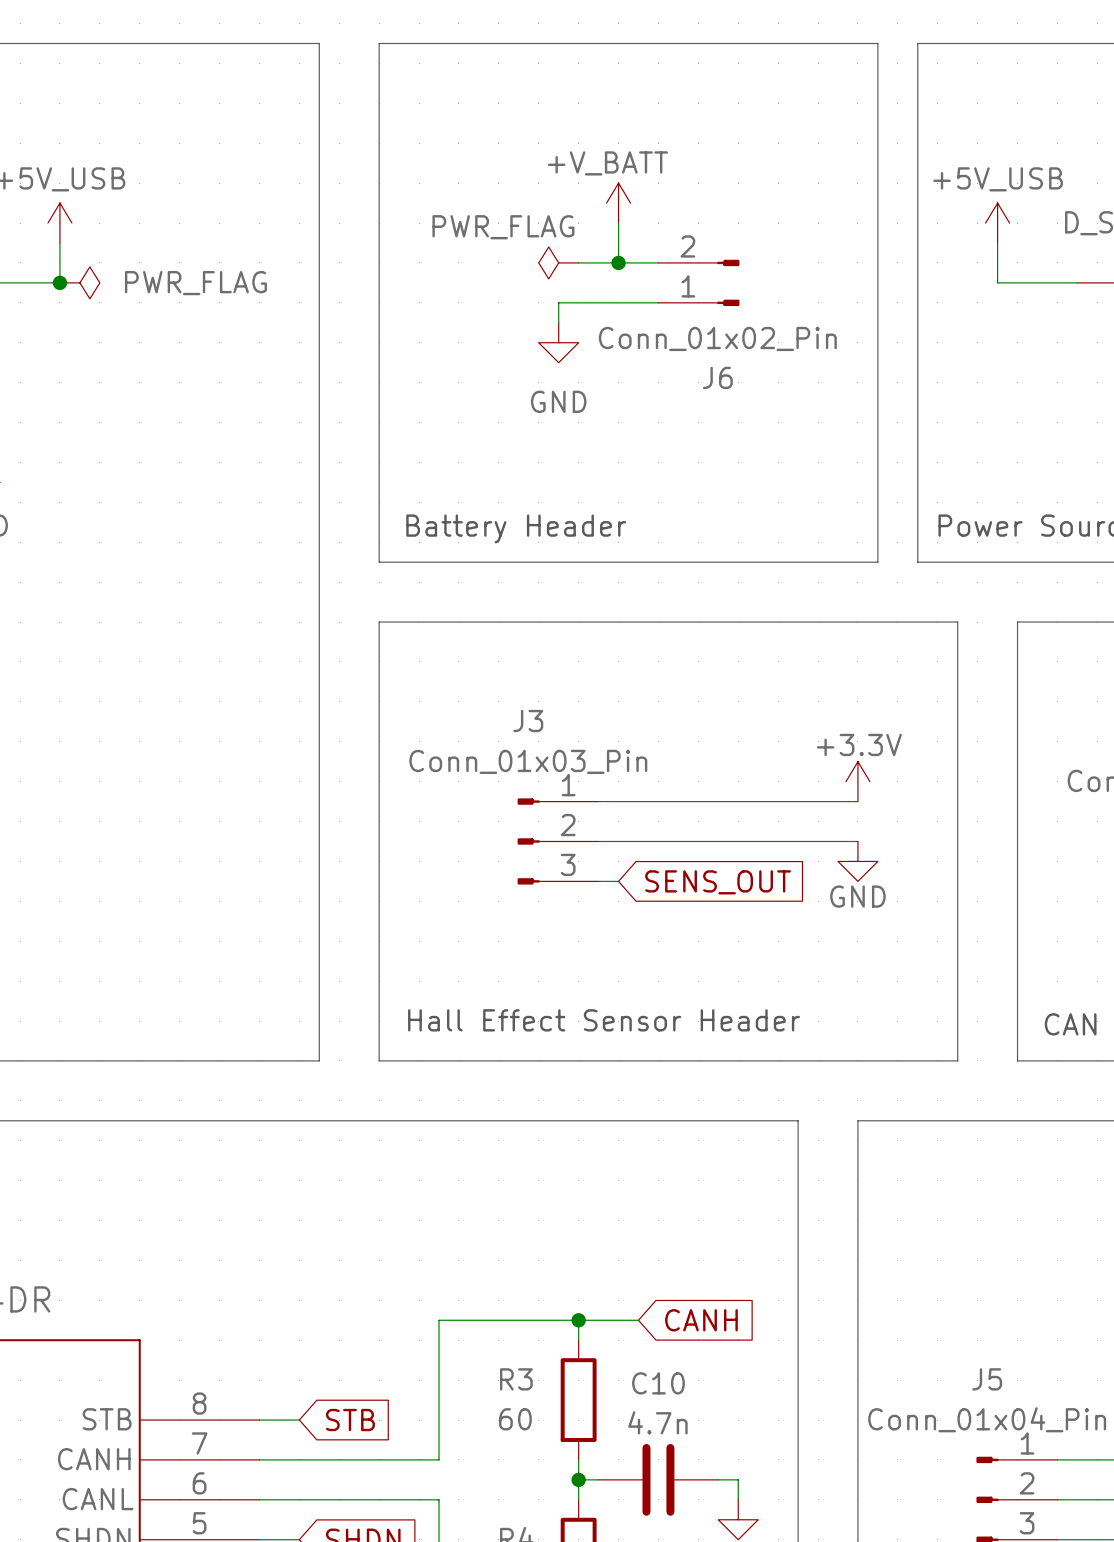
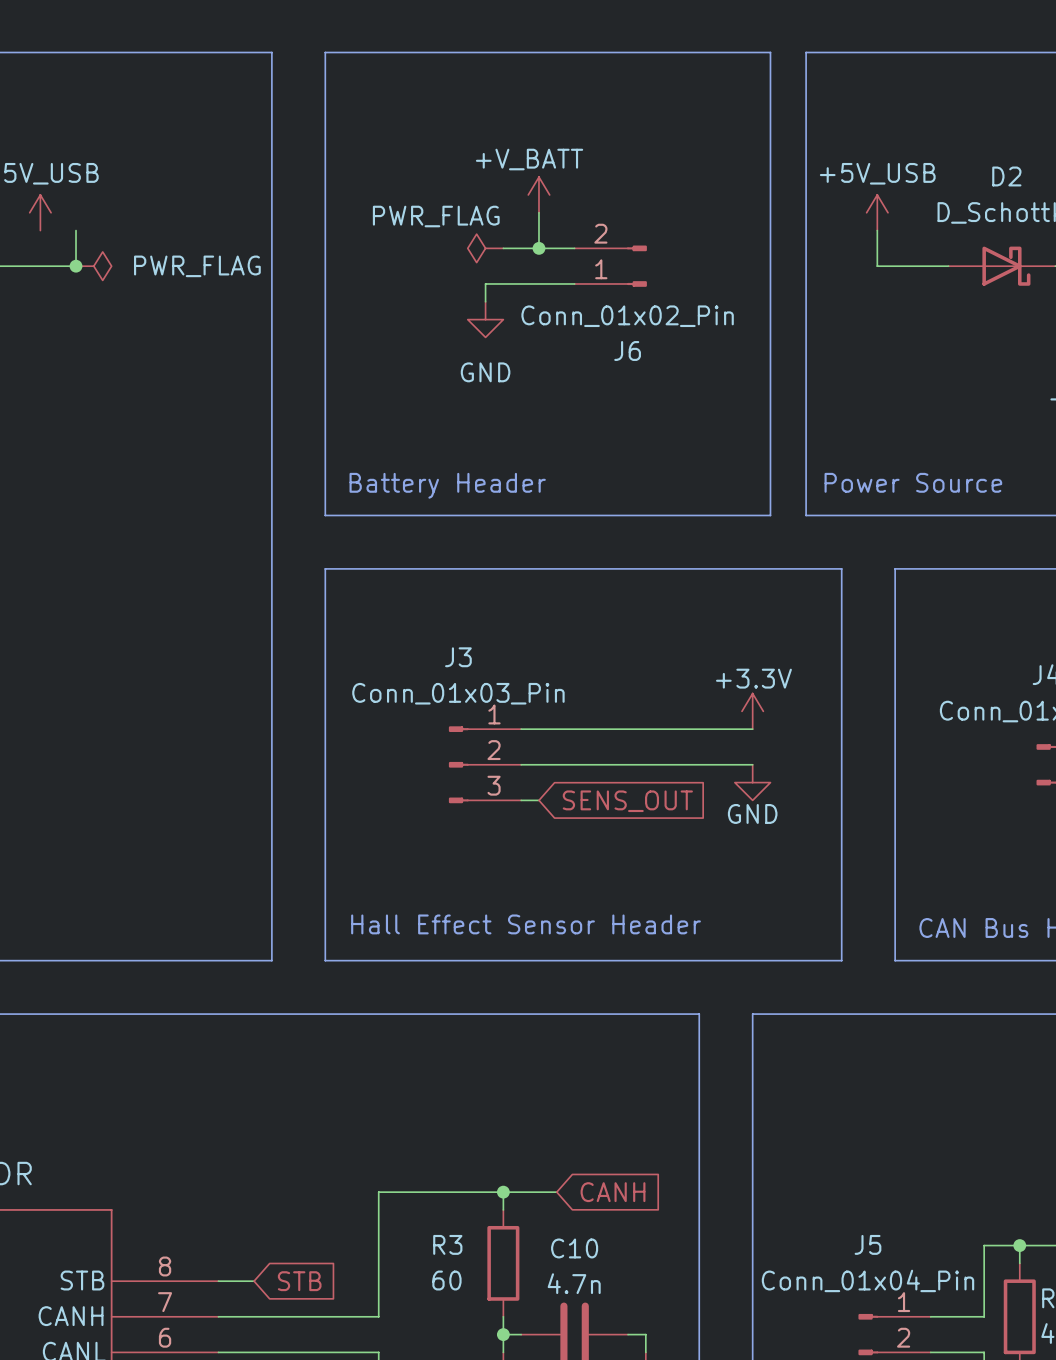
wire: (59, 242) (59, 282) -> (76, 230) (76, 266) (40, 266)
junction position: (59, 282) -> (76, 266)
power symbol position: PWR_FLAG (79, 282) -> PWR_FLAG (93, 266)

